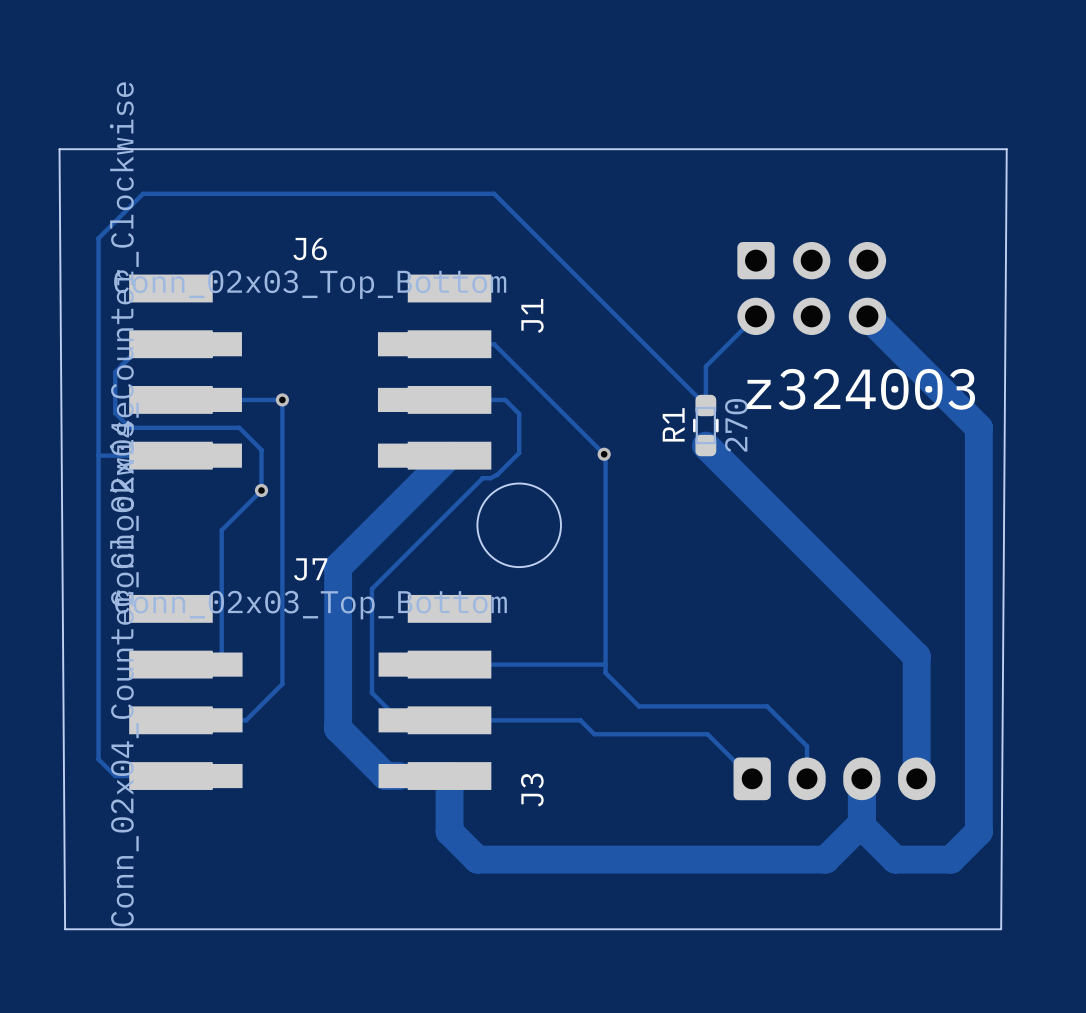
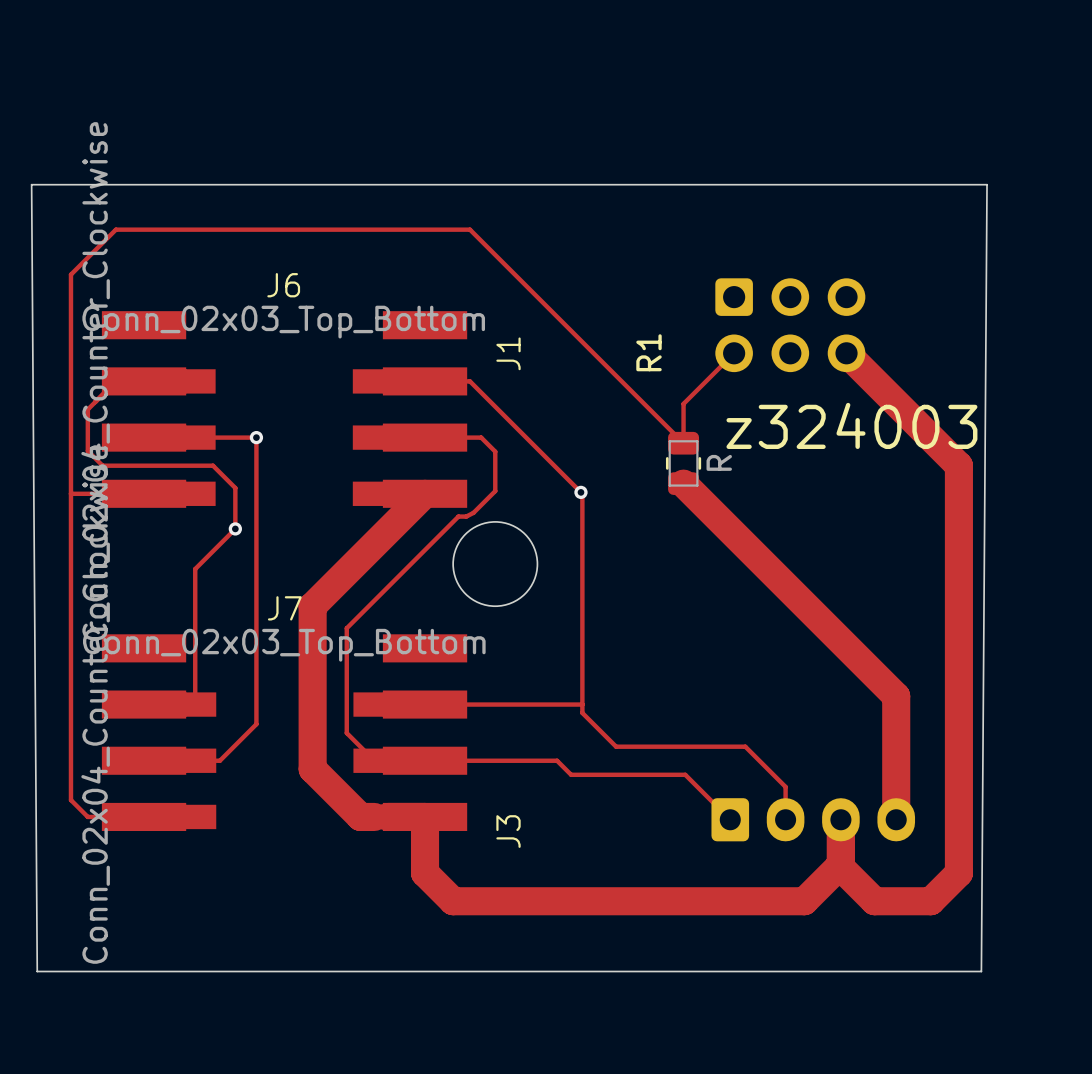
R1 footprint: [693, 394, 719, 457] -> [665, 431, 702, 495]
R1 name position: R1 (673, 424) -> R1 (649, 352)
R1 value: 270 (736, 425) -> R (719, 462)

